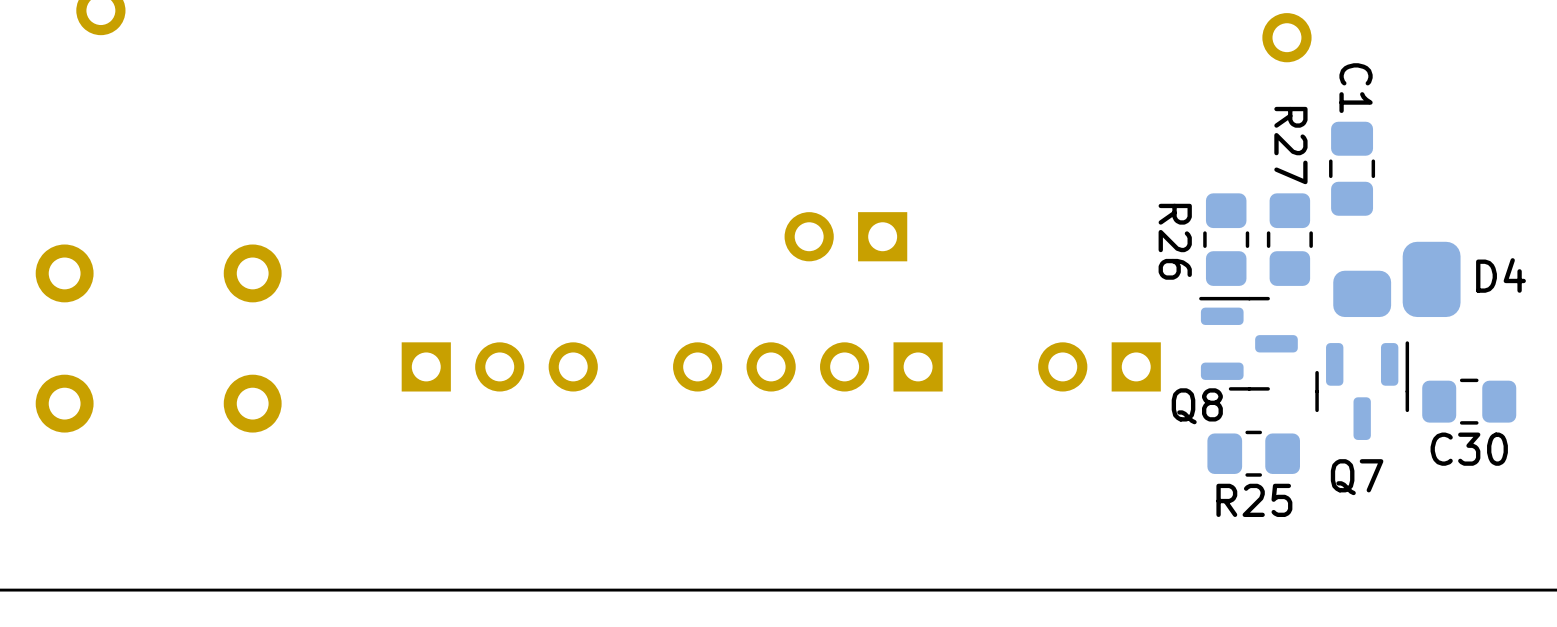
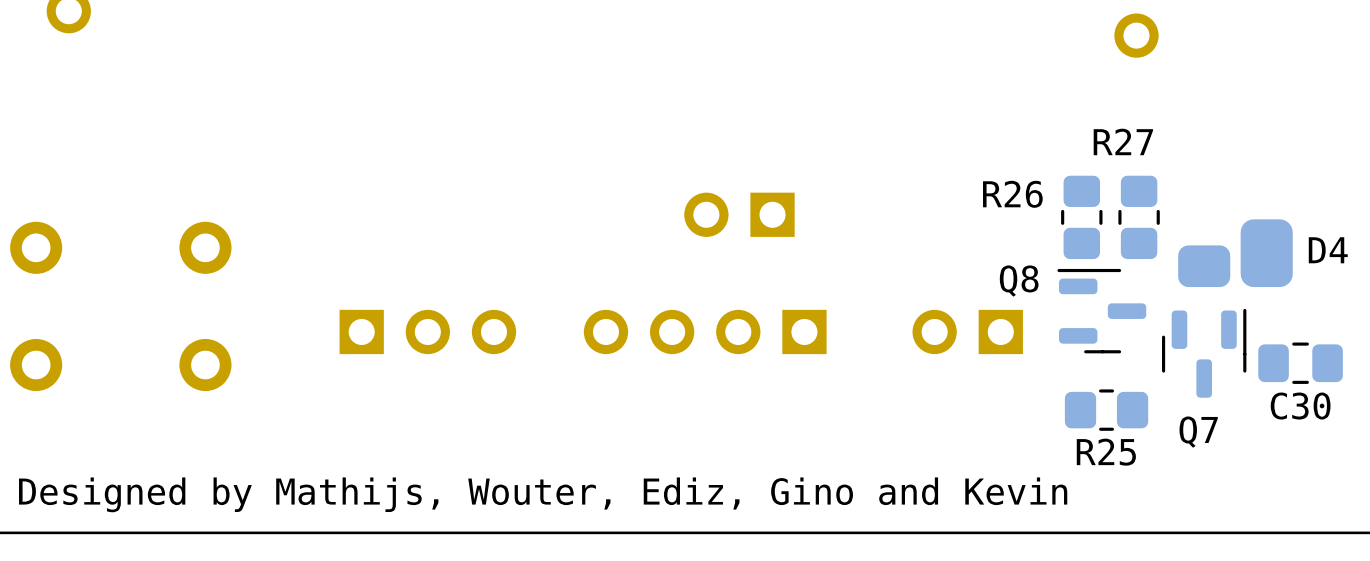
R27 name rotation: 0° (1290, 145) -> 90° counterclockwise (1123, 141)
C1: (1352, 168) -> none
R26 name rotation: 0° (1175, 241) -> 90° counterclockwise (1012, 194)
Q8 name position: Q8 (1197, 406) -> Q8 (1019, 281)
text: none -> Designed by Mathijs, Wouter, Ediz, Gino and Kevin (543, 494)

